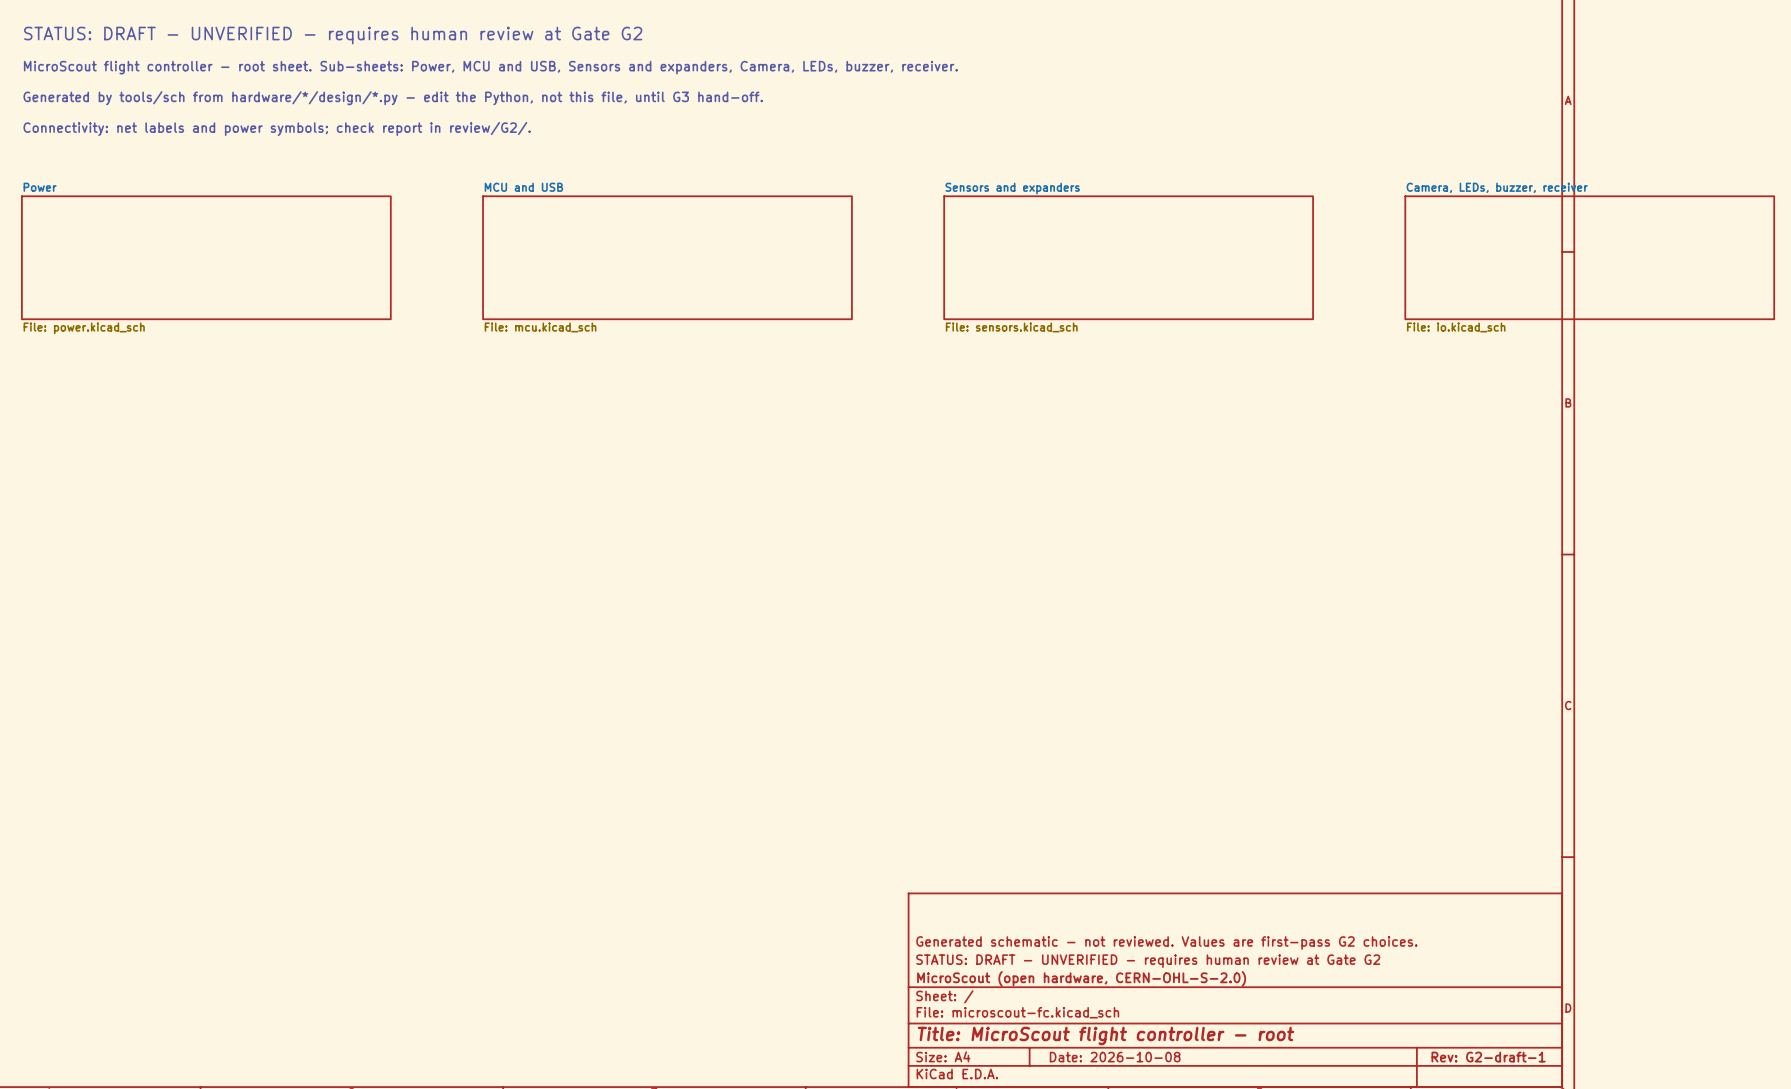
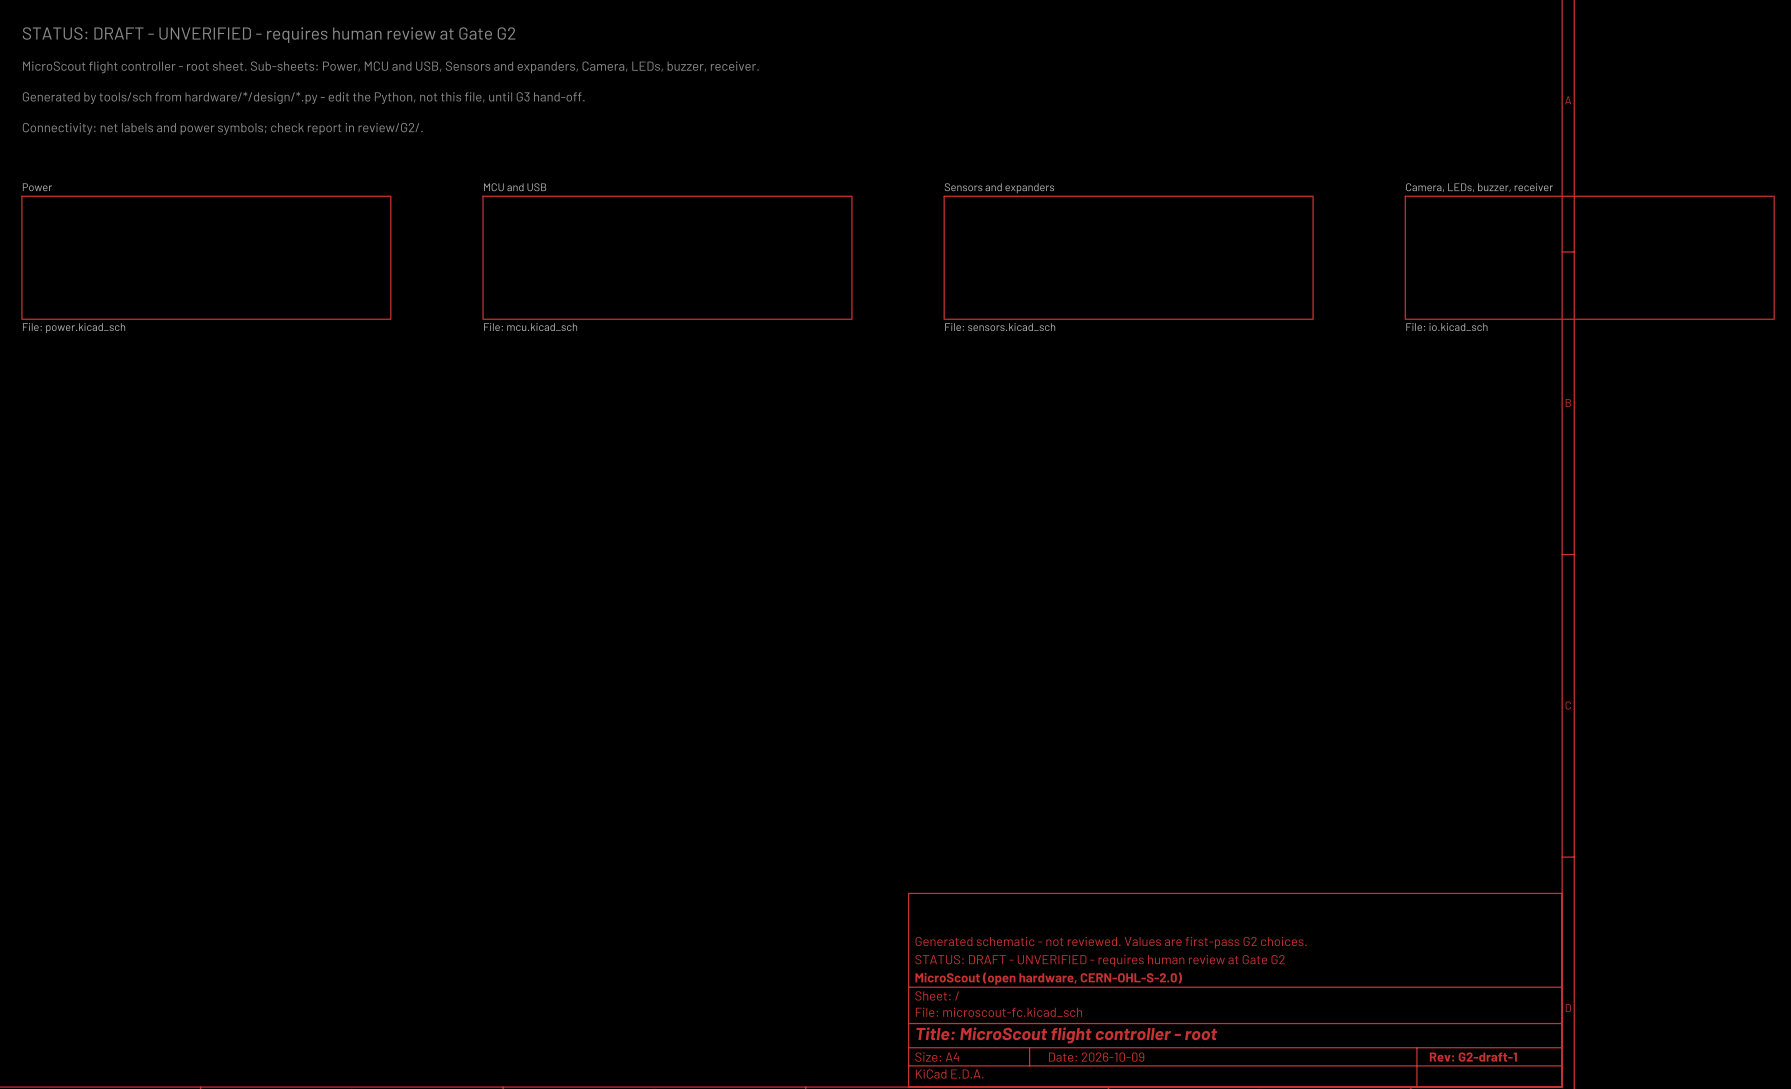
title block: Date: 2026-10-08 (1115, 1057) -> Date: 2026-10-09 (1096, 1057)

